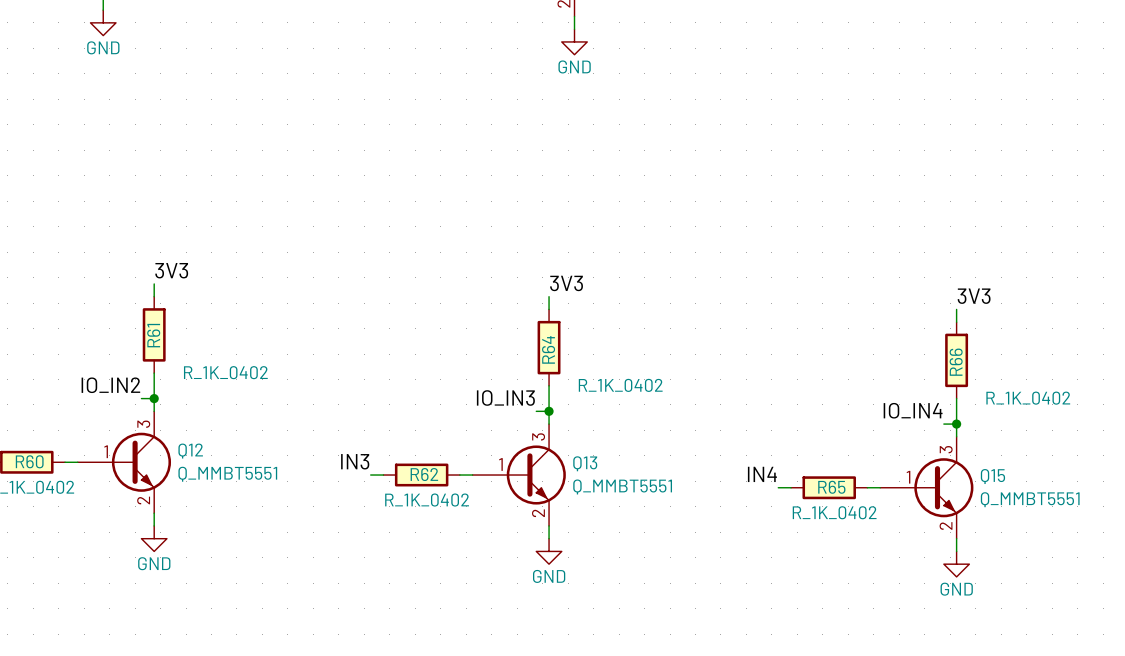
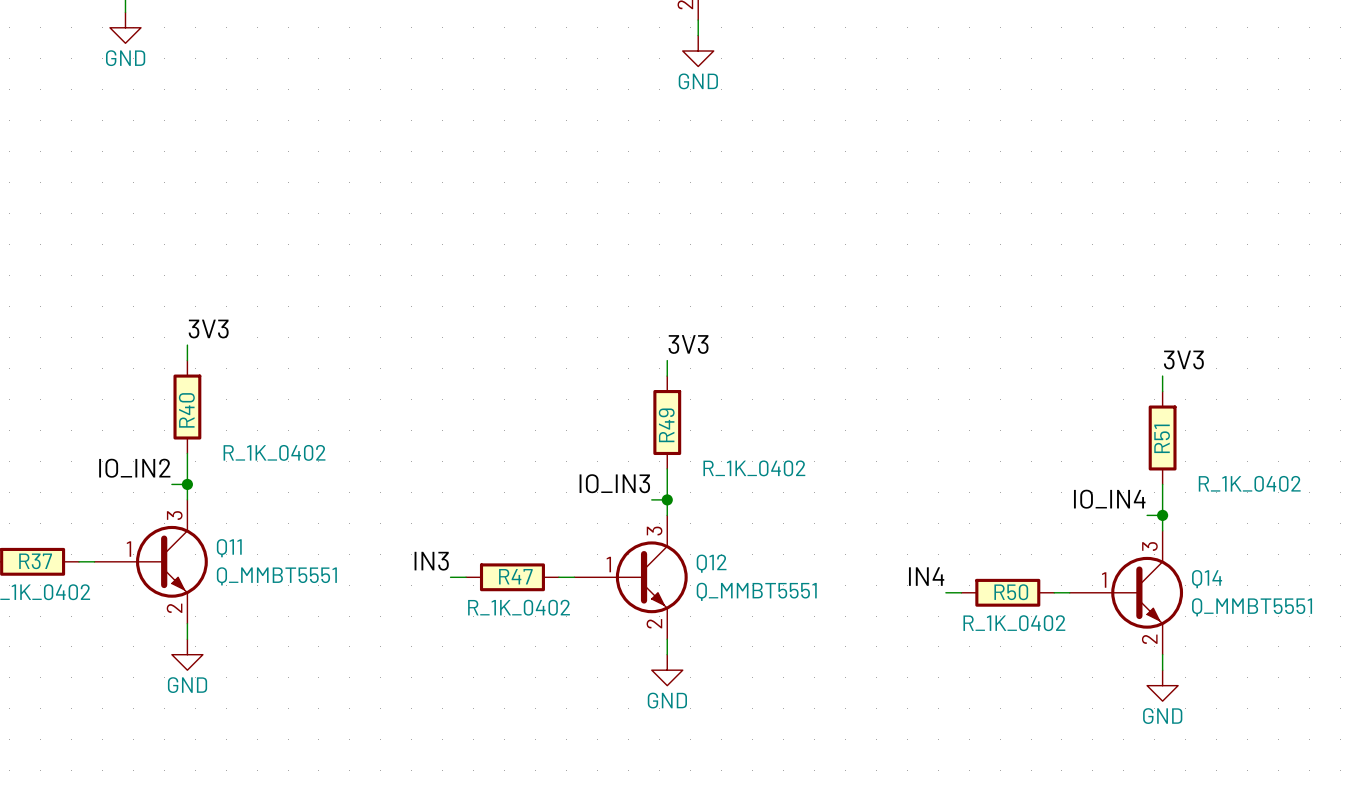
R61 name: R61 (153, 335) -> R40 (186, 410)
R64 name: R64 (548, 349) -> R49 (666, 425)
R66 name: R66 (956, 362) -> R51 (1162, 438)
Q12 name: Q12 (190, 451) -> Q11 (229, 548)
R60 name: R60 (29, 461) -> R37 (35, 561)
Q13 name: Q13 (585, 463) -> Q12 (711, 563)
R62 name: R62 (424, 474) -> R47 (515, 576)
Q15 name: Q15 (992, 476) -> Q14 (1207, 579)
R65 name: R65 (831, 487) -> R50 (1011, 592)

